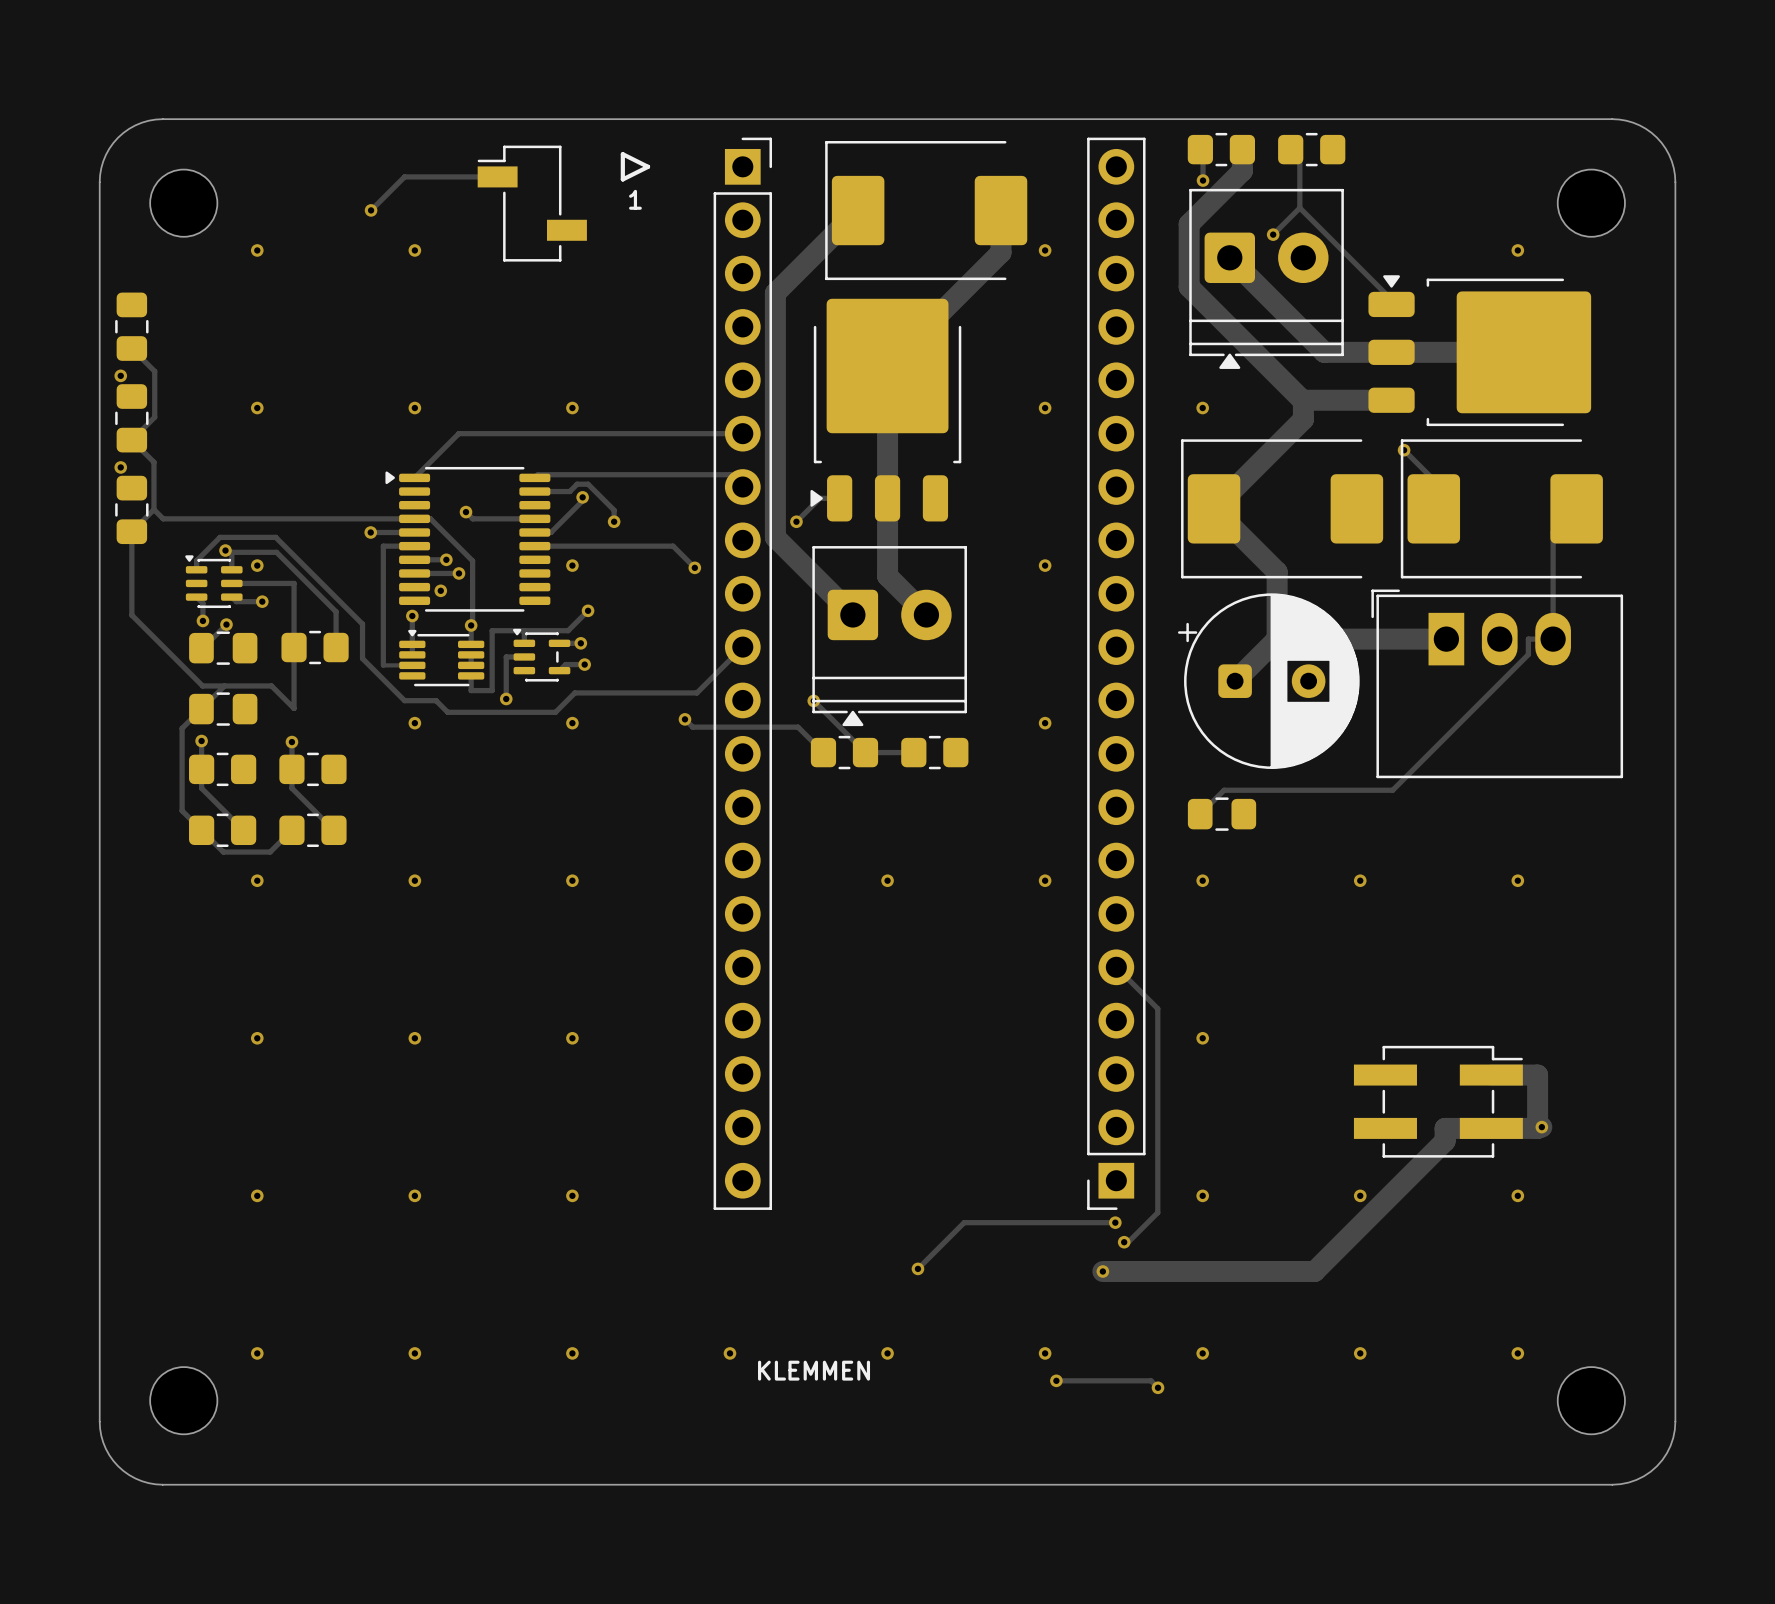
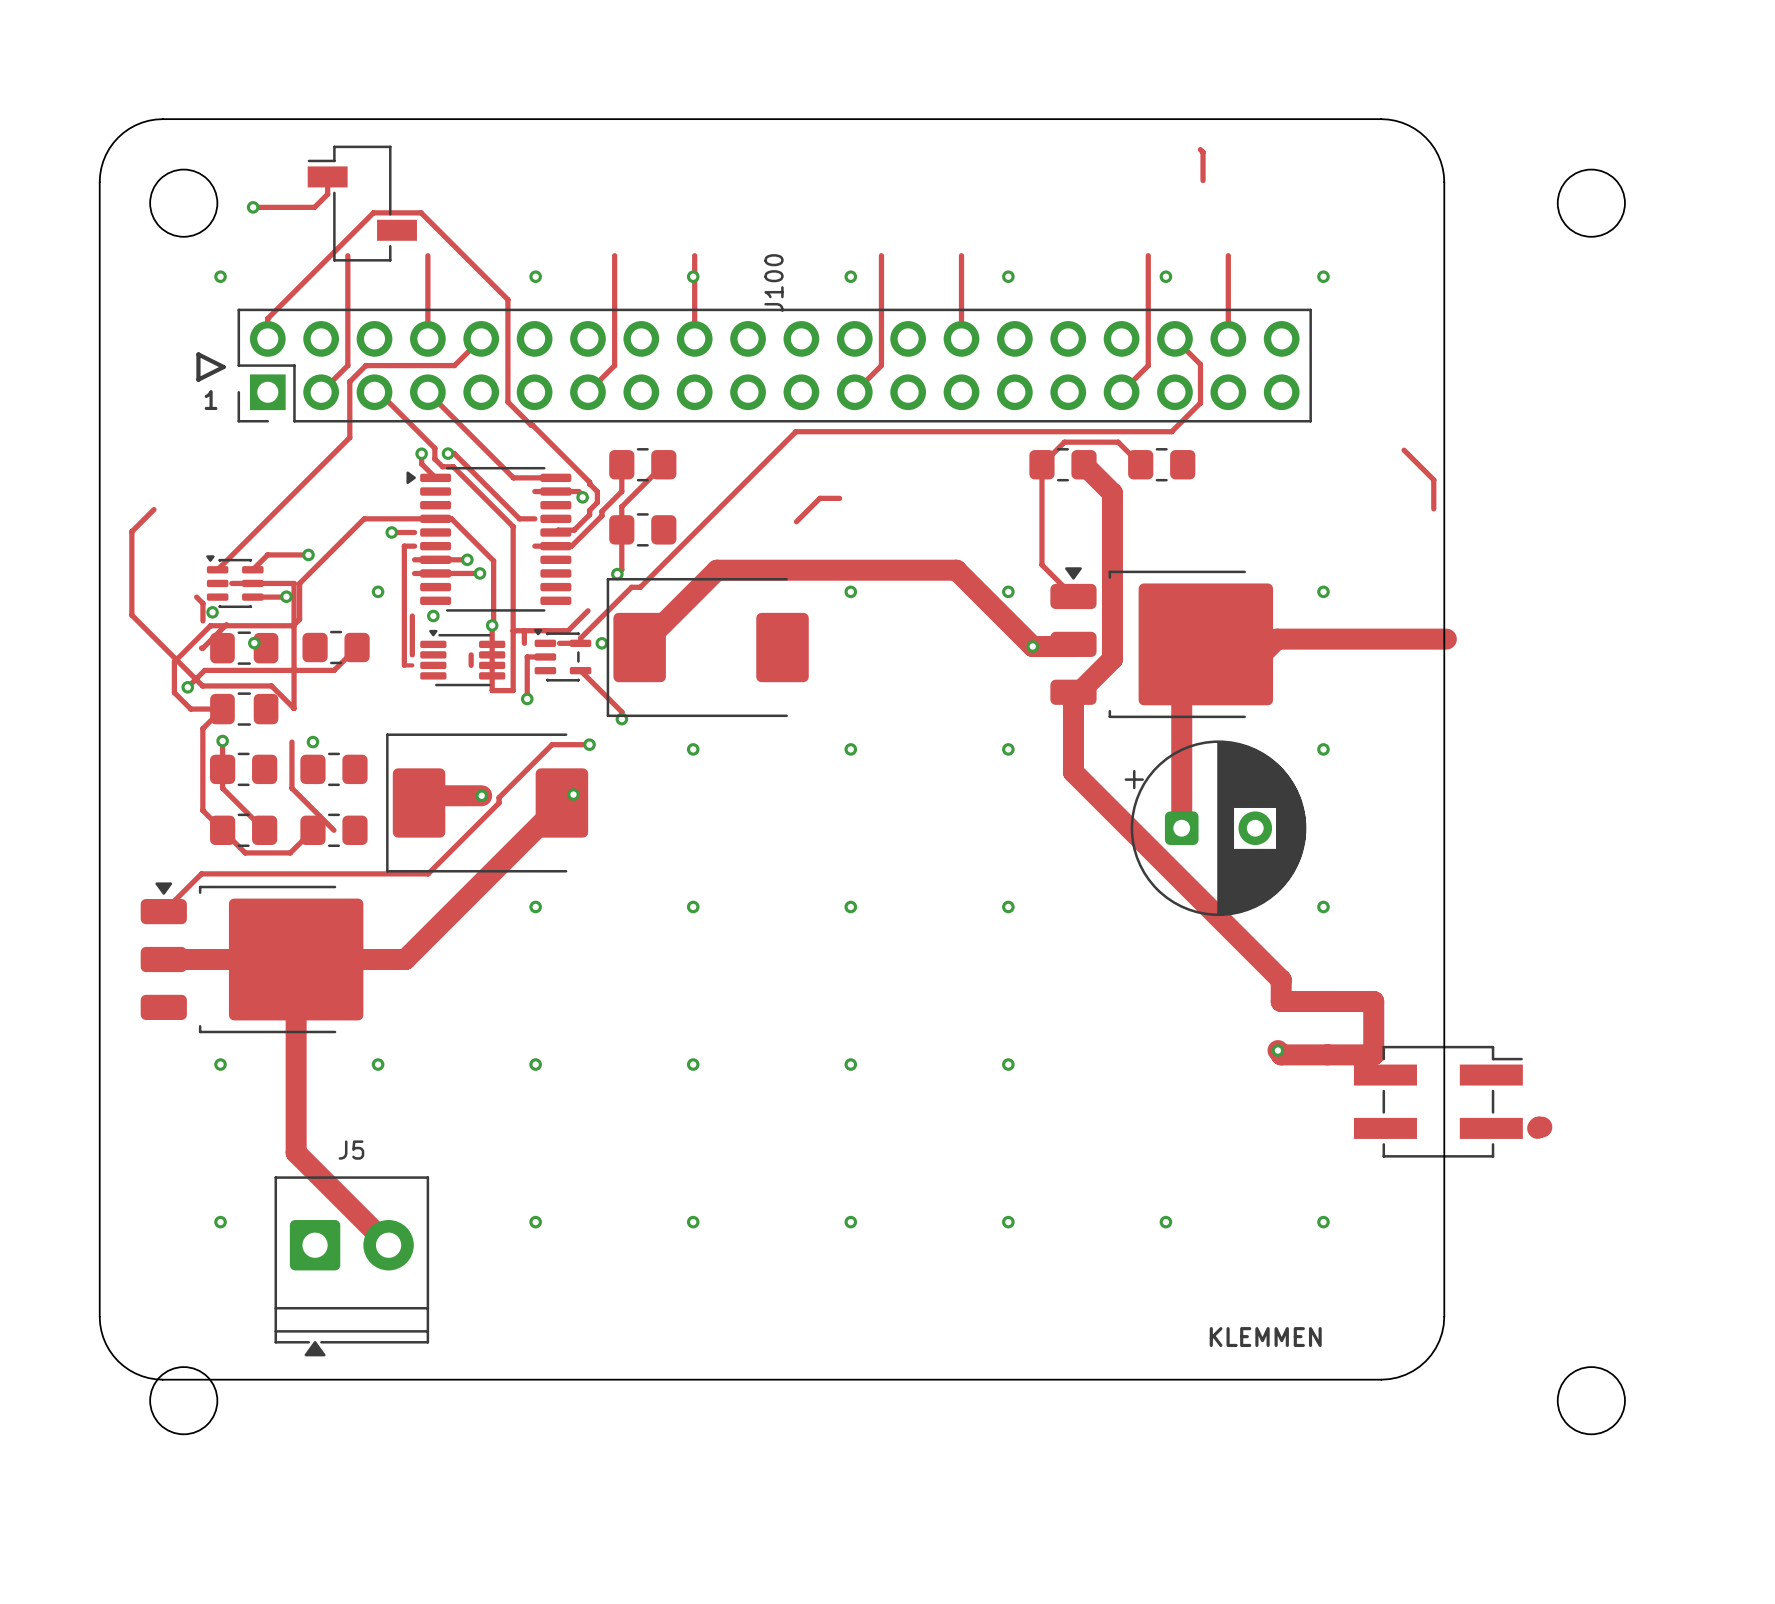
board edge: (1381, 119) (1619, 119) (1639, 125) (1656, 137) (1669, 154) (1673, 168) (1675, 182) (1675, 1421) (1670, 1445) (1656, 1466) (1636, 1479) (1612, 1484) (155, 1484) (135, 1478) (123, 1470) (109, 1455) (103, 1442) (99, 1421) (99, 1316) -> (1381, 119) (1402, 122) (1414, 128) (1425, 137) (1438, 154) (1442, 168) (1444, 182) (1444, 1316) (1439, 1340) (1425, 1361) (1405, 1374) (1381, 1379) (162, 1379) (148, 1378) (135, 1373) (118, 1361) (105, 1344) (101, 1330) (99, 1316)
part: (1221, 149) -> none
track: (1242, 149) (1242, 170) (1189, 224) (1189, 286) (1303, 401) -> none
track: (1290, 149) (1299, 158) (1299, 207) -> none
part: (1311, 149) -> none
line: (622, 154) (622, 179) (648, 166) (622, 154) -> (198, 354) (198, 379) (223, 367) (198, 354)
track: none -> (327, 176) (327, 194) (314, 207) (253, 207)
track: (497, 176) (404, 176) (371, 210) -> none
via: (1203, 180) -> none
text position: 1 (635, 199) -> 1 (211, 400)
part position: (532, 203) -> (362, 203)
via: none -> (253, 207)
track: (1299, 207) (1391, 299) (1391, 304) -> none
track: (1299, 207) (1273, 234) -> none
via: (371, 210) -> none
track: (858, 210) (775, 293) (775, 537) (852, 614) -> none
part: (926, 210) -> none
track: (1001, 210) (1001, 252) (887, 366) (887, 576) (926, 614) -> none
via: (1273, 234) -> none
via: (257, 250) -> none
via: (414, 250) -> none
via position: (1045, 250) -> (1008, 276)
via: (1517, 250) -> none
track: none -> (347, 255) (347, 365) (321, 392)
track: none -> (427, 255) (427, 338)
track: none -> (614, 255) (614, 365) (587, 392)
track: none -> (694, 255) (694, 338)
track: none -> (881, 255) (881, 365) (854, 392)
track: none -> (961, 255) (961, 338)
track: none -> (1148, 255) (1148, 365) (1121, 392)
track: none -> (1228, 255) (1228, 338)
track: (1229, 257) (1324, 352) (1523, 352) -> none
via: none -> (220, 276)
via: none -> (535, 276)
via: none -> (693, 276)
via: none -> (850, 276)
via: none -> (1165, 276)
via: none -> (1323, 276)
part: (1266, 278) -> none
part: (131, 326) -> none
track: none -> (267, 338) (267, 318) (373, 212) (421, 212) (507, 299) (507, 402) (597, 491) (597, 502) (589, 510) (589, 514) (574, 530) (558, 530) (555, 532)
track: none -> (481, 338) (454, 365) (365, 365) (349, 381) (349, 437) (217, 569)
track: none -> (1174, 338) (1200, 364) (1200, 403) (1171, 431) (795, 431) (640, 587) (631, 587) (580, 638) (580, 643)
track: (131, 348) (154, 371) (154, 417) (131, 440) (153, 462) (153, 509) (163, 518) (364, 518) -> (312, 830) (290, 852) (245, 852) (202, 810) (202, 728) (222, 709) (190, 709) (174, 692) (174, 661) (210, 625) (293, 625) (299, 619) (299, 583) (364, 518)
part: (1479, 350) -> none
J100: none -> (774, 365)
via: (120, 375) -> none
track: none -> (427, 392) (513, 477) (555, 477)
track: (1391, 400) (1303, 401) -> none
track: (1303, 401) (1303, 419) (1214, 508) (1277, 571) (1277, 639) -> none
via: (257, 408) -> none
via: (414, 408) -> none
via: (572, 408) -> none
via: (1045, 408) -> none
via: (1202, 408) -> none
part: (885, 410) -> none
part: (131, 418) -> none
track: (742, 433) (458, 433) (414, 477) -> none
via: (1404, 450) -> none
track: none -> (421, 453) (421, 463) (435, 477)
via: none -> (421, 453)
via: none -> (448, 453)
part: none -> (642, 464)
track: none -> (663, 464) (621, 506) (621, 569) (617, 574)
part: none -> (1062, 464)
track: none -> (1083, 464) (1112, 493) (1112, 659) (1079, 692) (1073, 692) (1073, 772) (1281, 980) (1281, 1001) (1373, 1001) (1373, 1054) (1281, 1054) (1277, 1050)
track: none -> (1140, 464) (1118, 442) (1064, 442) (1041, 464) (1041, 564) (1073, 596)
part: none -> (1161, 464)
via: (120, 467) -> none
track: (534, 477) (538, 474) (730, 474) (742, 487) -> none
track: (569, 491) (577, 484) (588, 484) (614, 510) (614, 521) -> (569, 491) (578, 491) (584, 497)
track: (582, 497) (582, 500) (550, 532) (534, 532) -> none
part: (1282, 508) -> none
part: (1501, 508) -> none
track: (1576, 508) (1553, 532) (1553, 639) (1528, 639) (1528, 654) (1392, 790) (1224, 790) (1200, 814) -> none
part: (131, 509) -> none
track: (466, 512) (472, 518) (519, 518) -> (448, 453) (454, 453) (519, 518)
via: (466, 512) -> none
track: (430, 518) (472, 560) (471, 644) -> (430, 518) (451, 518) (493, 560) (492, 630)
via: (614, 521) -> none
via: (796, 521) -> none
part: none -> (642, 529)
track: (370, 532) (391, 532) -> (446, 559) (467, 559)
via position: (370, 532) -> (391, 532)
part position: (467, 539) -> (488, 539)
track: (404, 546) (383, 546) (383, 665) (404, 665) -> (404, 546) (404, 665)
track: (571, 546) (673, 546) (694, 567) -> (571, 546) (601, 515) (601, 511) (621, 491) (621, 464)
track: (225, 550) (227, 552) (276, 552) (336, 611) (336, 647) -> none
via: (225, 550) -> none
track: (231, 552) (231, 569) -> none
track: none -> (308, 554) (267, 554) (252, 569)
via: none -> (308, 554)
via: (446, 559) -> none
via: none -> (467, 559)
via: (257, 565) -> none
via: (572, 565) -> none
via: (1045, 565) -> none
via: (694, 567) -> none
track: (196, 569) (196, 560) (220, 537) (275, 537) (362, 624) (362, 658) (404, 700) (436, 700) (447, 712) (555, 712) (574, 692) (696, 692) (742, 647) -> none
via: (458, 573) -> none
via: none -> (479, 573)
via: none -> (617, 574)
part position: (213, 581) -> (234, 581)
via: (440, 590) -> none
via: none -> (378, 591)
via: none -> (850, 591)
via: none -> (1008, 591)
via: none -> (1323, 591)
track: none -> (286, 596) (252, 597)
via: none -> (286, 596)
track: (231, 597) (236, 601) (262, 601) -> none
via: (262, 601) -> none
via: (588, 610) -> none
via: (412, 616) -> none
via: none -> (433, 616)
via position: (202, 620) -> (212, 612)
via: (226, 624) -> none
via: (471, 625) -> none
via: none -> (492, 625)
track: (492, 630) (513, 630) -> (458, 573) (479, 573)
part: (889, 636) -> none
part: none -> (1161, 642)
via: none -> (254, 643)
via: (580, 643) -> none
via: none -> (601, 643)
track: none -> (1073, 644) (1071, 646) (1032, 646) (956, 570) (716, 570) (639, 647)
track: none -> (1205, 644) (1181, 668) (1181, 828)
via: none -> (1032, 646)
part position: (315, 647) -> (336, 647)
track: none -> (357, 647) (334, 670) (204, 670) (187, 687)
part: none -> (707, 647)
part position: (223, 648) -> (244, 648)
part position: (541, 655) -> (562, 655)
track: (524, 656) (506, 656) (506, 698) -> (545, 656) (527, 656) (527, 698)
part position: (441, 658) -> (462, 658)
track: (584, 664) (565, 664) (559, 670) -> none
via: (584, 664) -> none
track: none -> (580, 670) (621, 711) (621, 719)
part: (742, 673) -> none
part: (1116, 673) -> none
track: (471, 675) (471, 690) (492, 690) -> (374, 392) (378, 392) (434, 448) (434, 459) (442, 466) (453, 466) (513, 526) (513, 690) (492, 690)
part: (1268, 681) -> none
part: (1497, 683) -> none
track: (224, 685) (182, 728) (182, 810) (223, 852) (270, 852) (291, 830) -> none
via: none -> (187, 687)
via position: (506, 698) -> (527, 698)
track: (813, 700) (865, 752) (913, 752) -> none
via: (813, 700) -> none
part position: (223, 709) -> (244, 709)
via: none -> (621, 719)
track: (684, 719) (692, 727) (798, 727) (823, 752) -> none
via position: (684, 719) -> (693, 749)
via: (414, 723) -> none
via: (572, 723) -> none
via: (1045, 723) -> none
track: (201, 741) (201, 788) (243, 830) -> (222, 741) (222, 788) (264, 830)
via position: (201, 741) -> (222, 741)
via position: (291, 742) -> (312, 742)
track: none -> (589, 744) (552, 744) (499, 797) (499, 802) (428, 873) (201, 873) (163, 911)
via: none -> (589, 744)
via: none -> (850, 749)
via: none -> (1008, 749)
via: none -> (1323, 749)
part: (844, 752) -> none
part: (934, 752) -> none
part position: (222, 769) -> (243, 769)
part position: (312, 769) -> (333, 769)
track: none -> (573, 794) (570, 794) (405, 959) (163, 959)
via: none -> (573, 794)
track: none -> (481, 795) (426, 795) (419, 802)
via: none -> (481, 795)
part footprint: [1187, 797, 1257, 831] -> [1124, 740, 1307, 917]
part: none -> (487, 802)
part position: (222, 830) -> (243, 830)
part position: (312, 830) -> (333, 830)
via: (257, 880) -> none
via: (414, 880) -> none
via: (572, 880) -> none
via position: (887, 880) -> (850, 906)
via position: (1045, 880) -> (1008, 906)
via: (1202, 880) -> none
via position: (1360, 880) -> (1323, 906)
via: (1517, 880) -> none
via: none -> (535, 906)
via: none -> (693, 906)
part: none -> (252, 957)
track: none -> (296, 959) (296, 1152) (388, 1245)
track: (1116, 967) (1157, 1008) (1157, 1212) (1128, 1242) (1124, 1242) -> none
via position: (257, 1038) -> (220, 1064)
via position: (414, 1038) -> (378, 1064)
via position: (572, 1038) -> (535, 1064)
via position: (1202, 1038) -> (1277, 1050)
via: none -> (693, 1064)
via: none -> (850, 1064)
via: none -> (1008, 1064)
track: (1491, 1075) (1537, 1075) (1537, 1128) (1445, 1128) (1445, 1141) (1314, 1271) (1102, 1271) -> none
via: (1541, 1127) -> none
via position: (257, 1195) -> (220, 1222)
via: (414, 1195) -> none
via position: (572, 1195) -> (535, 1222)
via: (1202, 1195) -> none
via position: (1360, 1195) -> (1323, 1222)
via: (1517, 1195) -> none
via: none -> (693, 1222)
via: none -> (850, 1222)
via: none -> (1008, 1222)
track: (1115, 1222) (964, 1222) (917, 1268) -> none
via: (1115, 1222) -> none
via: none -> (1165, 1222)
via: (1124, 1242) -> none
J5: none -> (351, 1266)
via: (917, 1268) -> none
via: (1102, 1271) -> none
via: (257, 1353) -> none
via: (414, 1353) -> none
via: (572, 1353) -> none
via: (729, 1353) -> none
via: (887, 1353) -> none
via: (1045, 1353) -> none
via: (1202, 1353) -> none
via: (1360, 1353) -> none
via: (1517, 1353) -> none
text position: KLEMMEN (814, 1370) -> KLEMMEN (1265, 1337)
track: (1056, 1380) (1151, 1380) (1158, 1387) -> none
via: (1056, 1380) -> none
via: (1158, 1387) -> none

